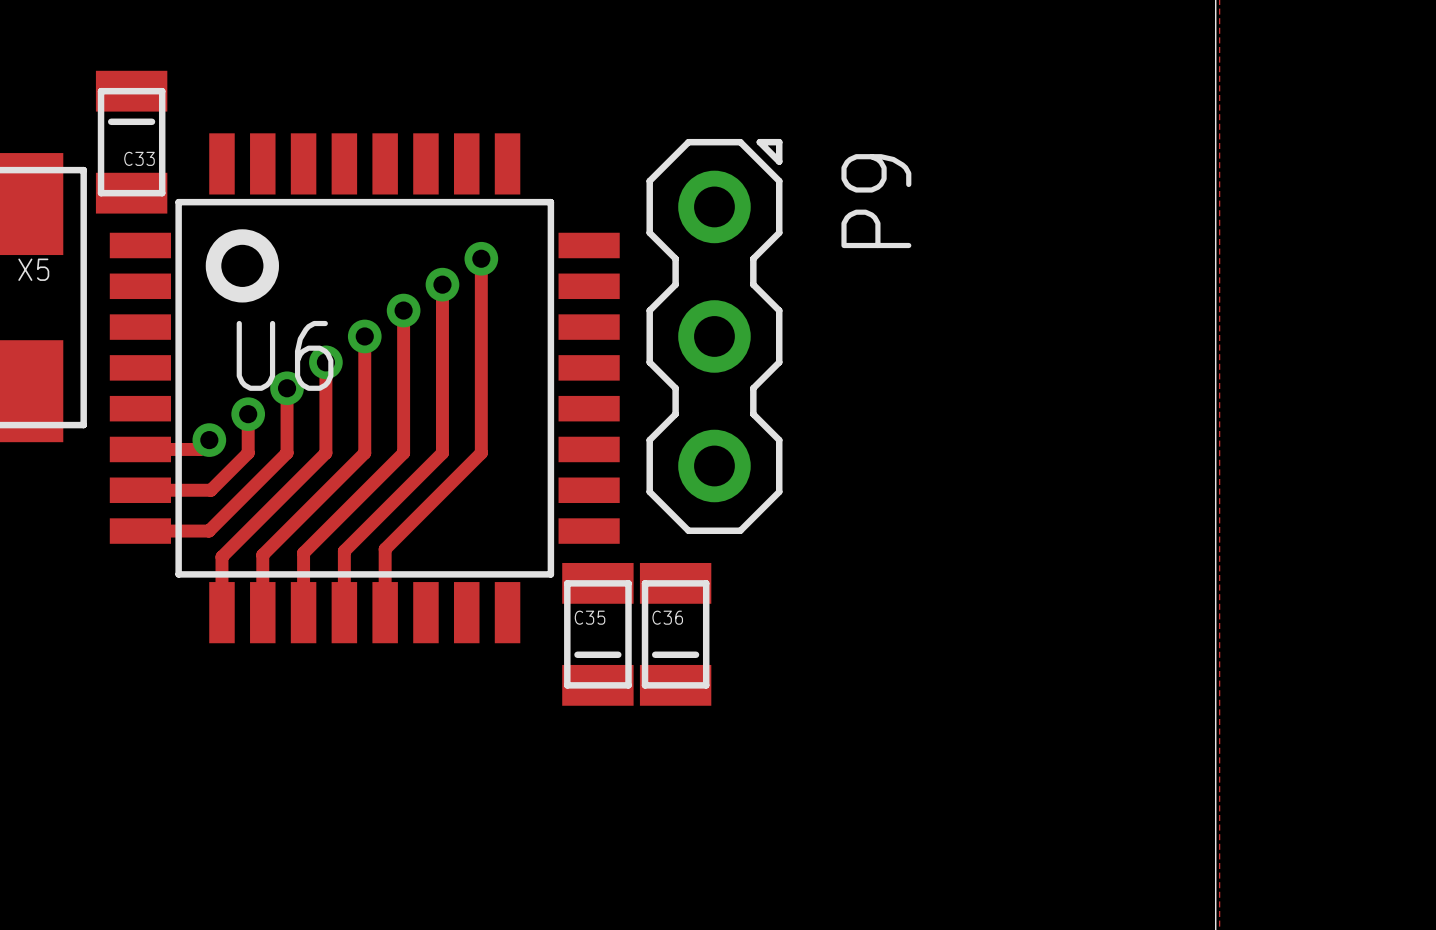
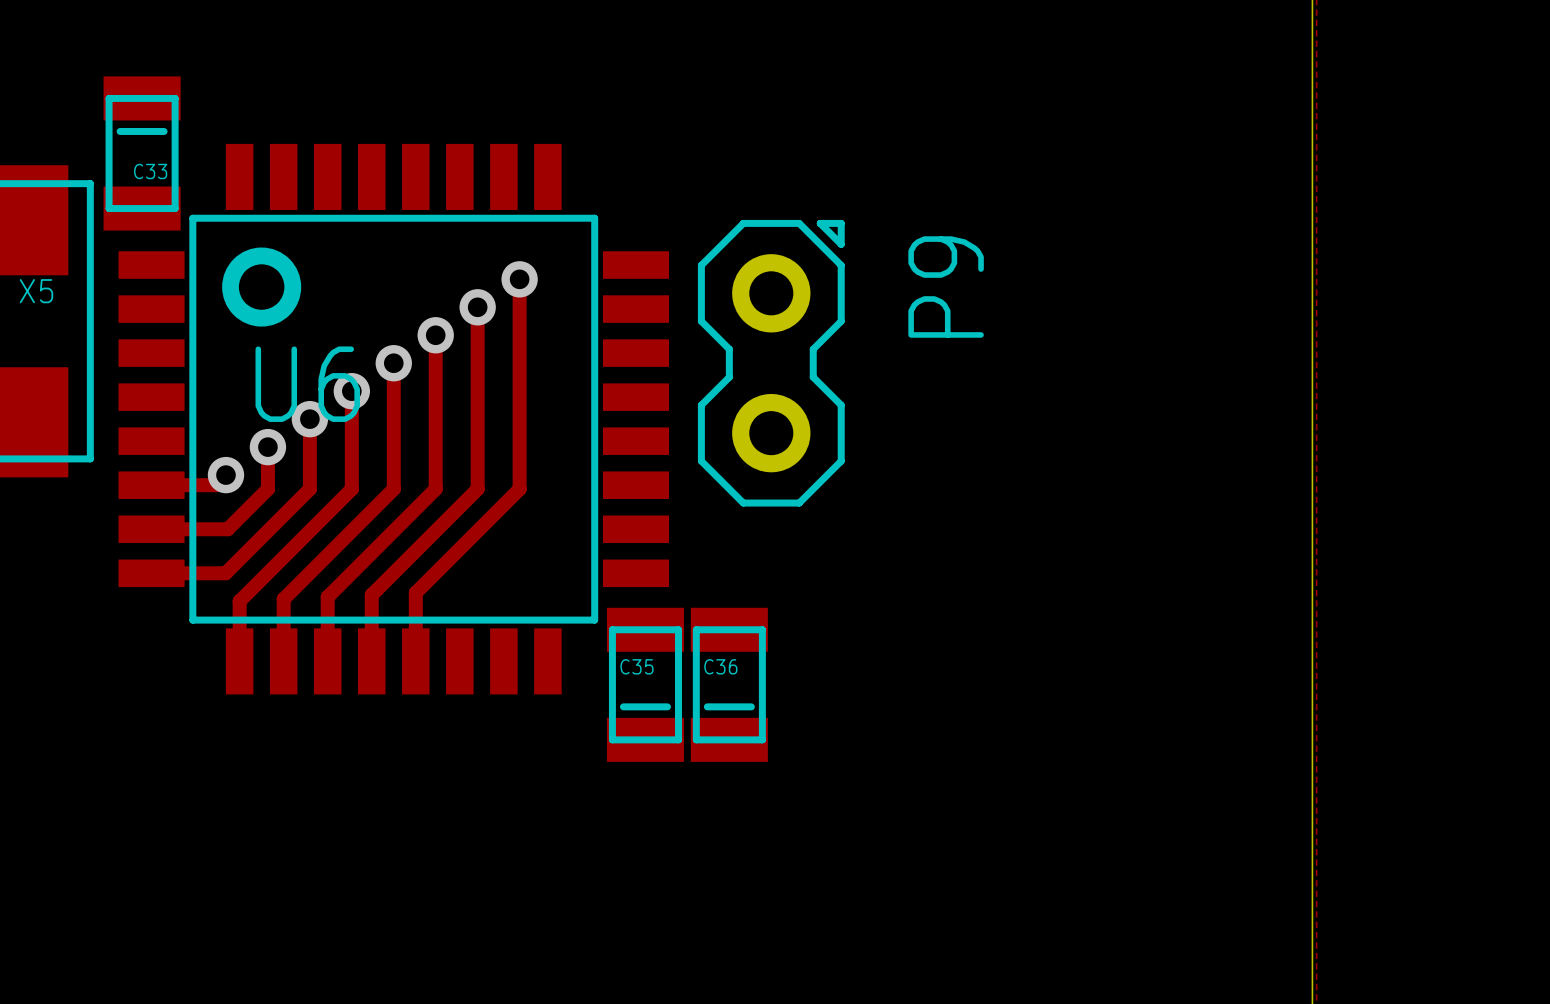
P9 footprint: [646, 138, 783, 534] -> [697, 219, 845, 507]

